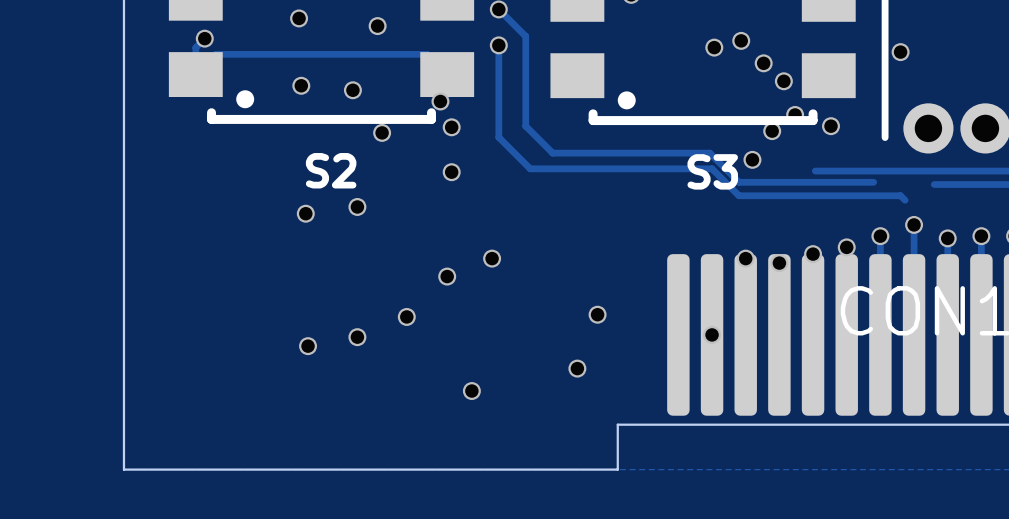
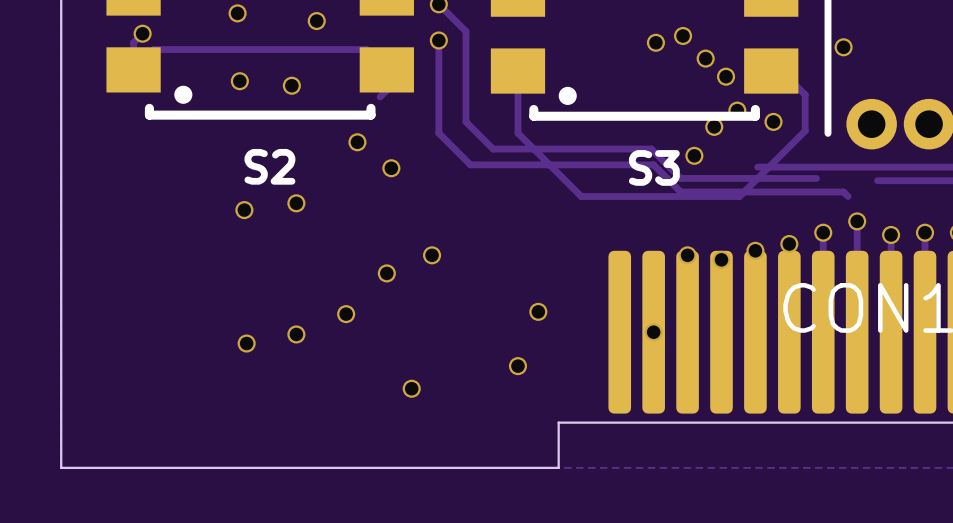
track: none -> (771, 60) (805, 94) (805, 130) (739, 196) (581, 196) (517, 133) (517, 60)
via: (440, 101) -> none
via: (451, 127) -> none
via: (382, 132) -> none
via: none -> (357, 142)

